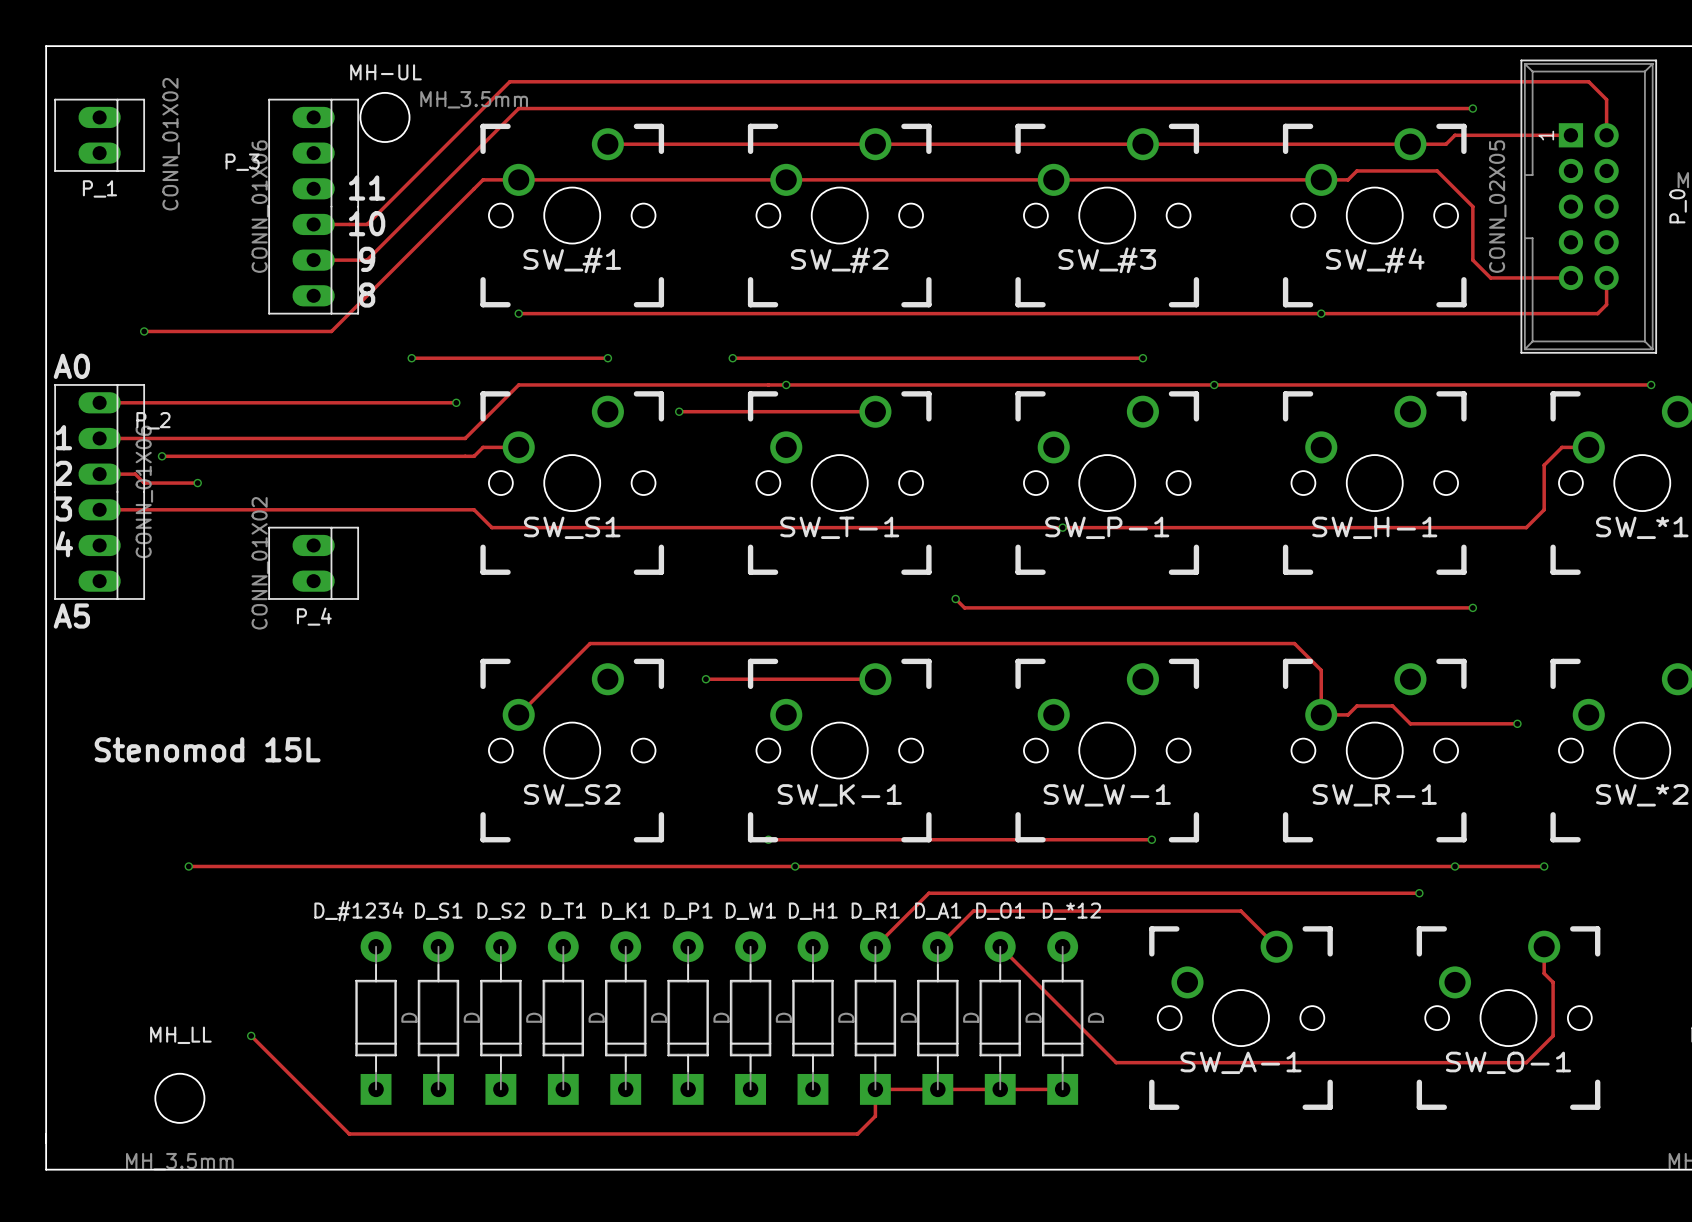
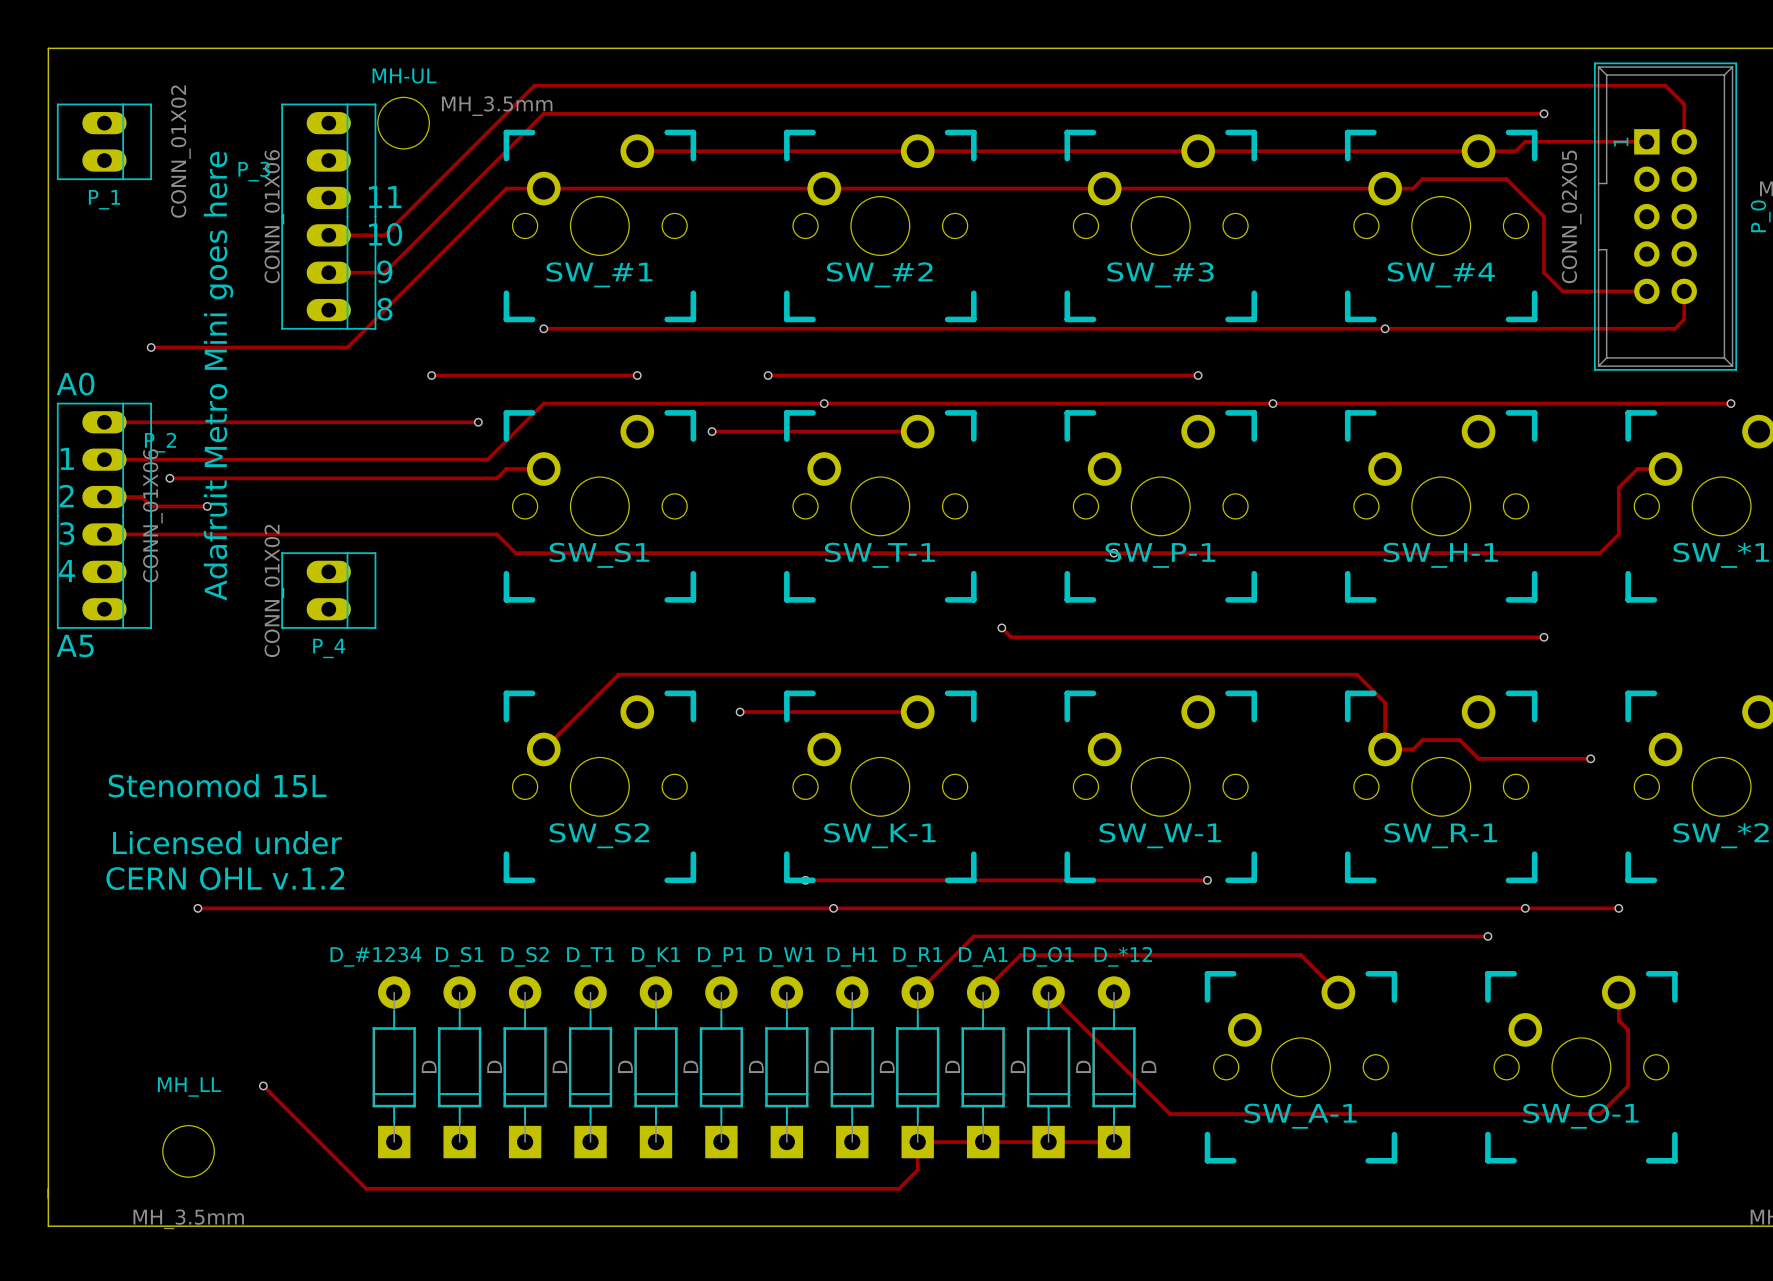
text: none -> Adafruit Metro Mini goes here (218, 376)
text: none -> Licensed under (227, 842)
text: none -> CERN OHL v.1.2 (225, 878)

